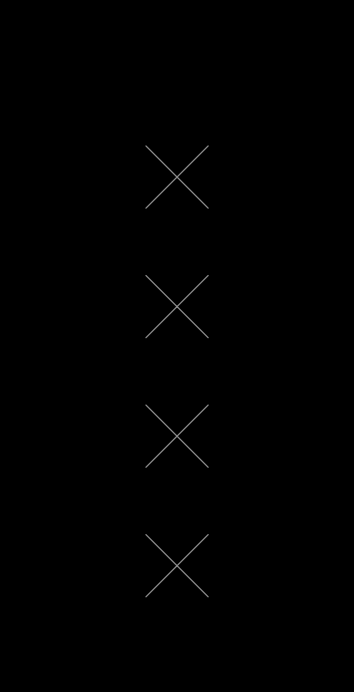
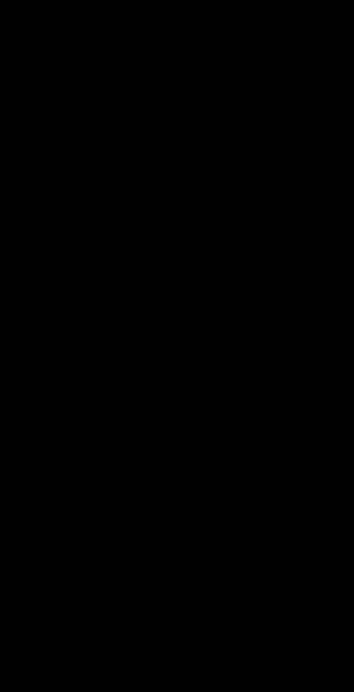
no-connect mark: (177, 177) -> none
no-connect mark: (177, 306) -> none
no-connect mark: (177, 436) -> none
no-connect mark: (177, 565) -> none

